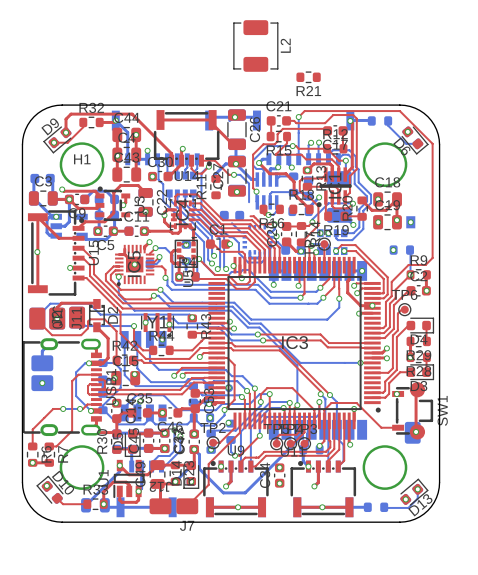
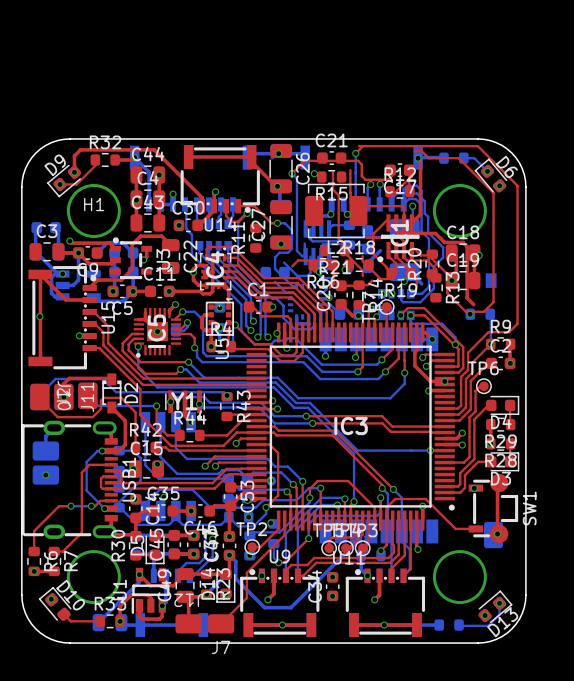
L2 rotation: 0° (255, 45) -> 90° clockwise (336, 210)
L2 position: (255, 45) -> (336, 210)
R21 position: (308, 77) -> (335, 250)
top track: (347, 115) (333, 115) (325, 123) (300, 123) -> (391, 176) (388, 179) (365, 179) (361, 176) (361, 164) (358, 160)
top track: (356, 118) (356, 169) (349, 176) (349, 192) (345, 196) -> (425, 155) (428, 158) (458, 158) (493, 192) (493, 302) (483, 311) (465, 311) (447, 293) (447, 273) (428, 255) (420, 255) (411, 246)
top track: (271, 120) (270, 136) -> none
top track: (286, 120) (294, 120) (296, 123) -> (292, 173) (304, 160) (352, 160)
bottom track: (388, 120) (388, 125) (406, 143) (417, 143) -> (463, 158) (474, 158) (487, 171)
top track: (327, 130) (325, 128) (282, 128) (277, 134) (277, 141) (274, 144) (263, 144) (253, 154) (253, 188) (256, 191) -> none
top track: none -> (333, 172) (333, 189) (338, 195) (338, 238) (345, 244) (345, 252) (362, 270) (362, 276)
bottom track: none -> (292, 173) (296, 178) (296, 250) (302, 256)
via: none -> (292, 173)
via: none -> (314, 173)
top track: (287, 136) (287, 143) (275, 154) (301, 154) -> none
top track: none -> (412, 176) (392, 195)
D6 rotation: 0° (415, 140) -> 180° (490, 175)
via: none -> (499, 185)
via: none -> (277, 186)
top track: (292, 146) (298, 148) (327, 148) (339, 160) (345, 160) -> none
bottom track: (292, 146) (267, 146) (253, 160) (253, 165) (256, 168) (263, 170) (263, 179) -> none
via: (292, 146) -> none
top track: (306, 159) (331, 159) (338, 166) -> (350, 170) (350, 203) (358, 210) (363, 206) (402, 206) (404, 212)
via: (235, 163) -> none
top track: (259, 163) (269, 173) (285, 173) (294, 181) (294, 193) (309, 209) -> none
via: (259, 163) -> none
bottom track: (351, 168) (354, 171) (354, 184) (367, 196) (367, 201) (359, 209) -> (403, 204) (403, 189) (407, 185) (416, 185) (421, 190) (421, 231) (428, 238) (428, 264)
top track: (307, 170) (313, 163) (330, 163) (332, 171) -> none
via: (307, 170) -> none
top track: none -> (388, 218) (373, 234) (373, 253) (386, 268)
top track: (325, 174) (321, 178) (302, 178) (299, 181) (299, 190) (318, 206) (318, 225) (301, 242) -> none
top track: none -> (396, 222) (396, 231) (398, 233) (435, 233) (444, 242) (462, 242) (467, 246) (467, 297) (473, 304)
bottom track: (213, 176) (225, 163) (235, 163) (251, 179) (257, 179) -> none
R13 position: (307, 178) -> (435, 287)
bottom track: none -> (402, 227) (392, 237) (341, 237) (337, 241) (312, 241) (310, 239) (310, 228)
bottom track: (245, 180) (249, 183) (249, 202) -> (291, 230) (291, 248) (288, 252) (279, 252) (275, 257) (275, 268) (292, 286) (296, 286)
via: (256, 191) -> none
via: (319, 197) -> none
top track: none -> (404, 250) (404, 257) (407, 260) (426, 260) (435, 269) (435, 277)
via: (378, 199) -> none
top track: (397, 199) (386, 210) (372, 210) (362, 200) -> none
top track: (325, 201) (325, 214) (328, 216) -> (388, 256) (396, 263) (396, 274) (391, 279) (380, 279) (362, 261) (362, 256)
top track: none -> (456, 255) (456, 280)
via: none -> (479, 255)
bottom track: none -> (310, 256) (310, 272) (307, 275) (297, 275) (284, 262)
bottom track: none -> (318, 256) (318, 273) (322, 278) (332, 278)
top track: (332, 202) (334, 208) (348, 208) (352, 203) -> (396, 256) (416, 277) (416, 288)
bottom track: (352, 203) (328, 203) (312, 219) (312, 222) -> none
via: (352, 203) -> none
top track: none -> (292, 266) (298, 260) (330, 260) (333, 263) (333, 284) (329, 287)
via: none -> (345, 269)
top track: (361, 215) (344, 216) -> none
top track: (250, 216) (253, 216) (261, 224) (274, 224) -> none
via: (396, 220) -> none
via: (312, 222) -> none
via: (410, 222) -> none
via: none -> (404, 281)
via: (353, 224) -> none
bottom track: none -> (410, 315) (410, 321) (412, 323) (441, 323) (455, 337) (455, 344)
top track: none -> (422, 332) (425, 332) (432, 339)
via: none -> (455, 344)

